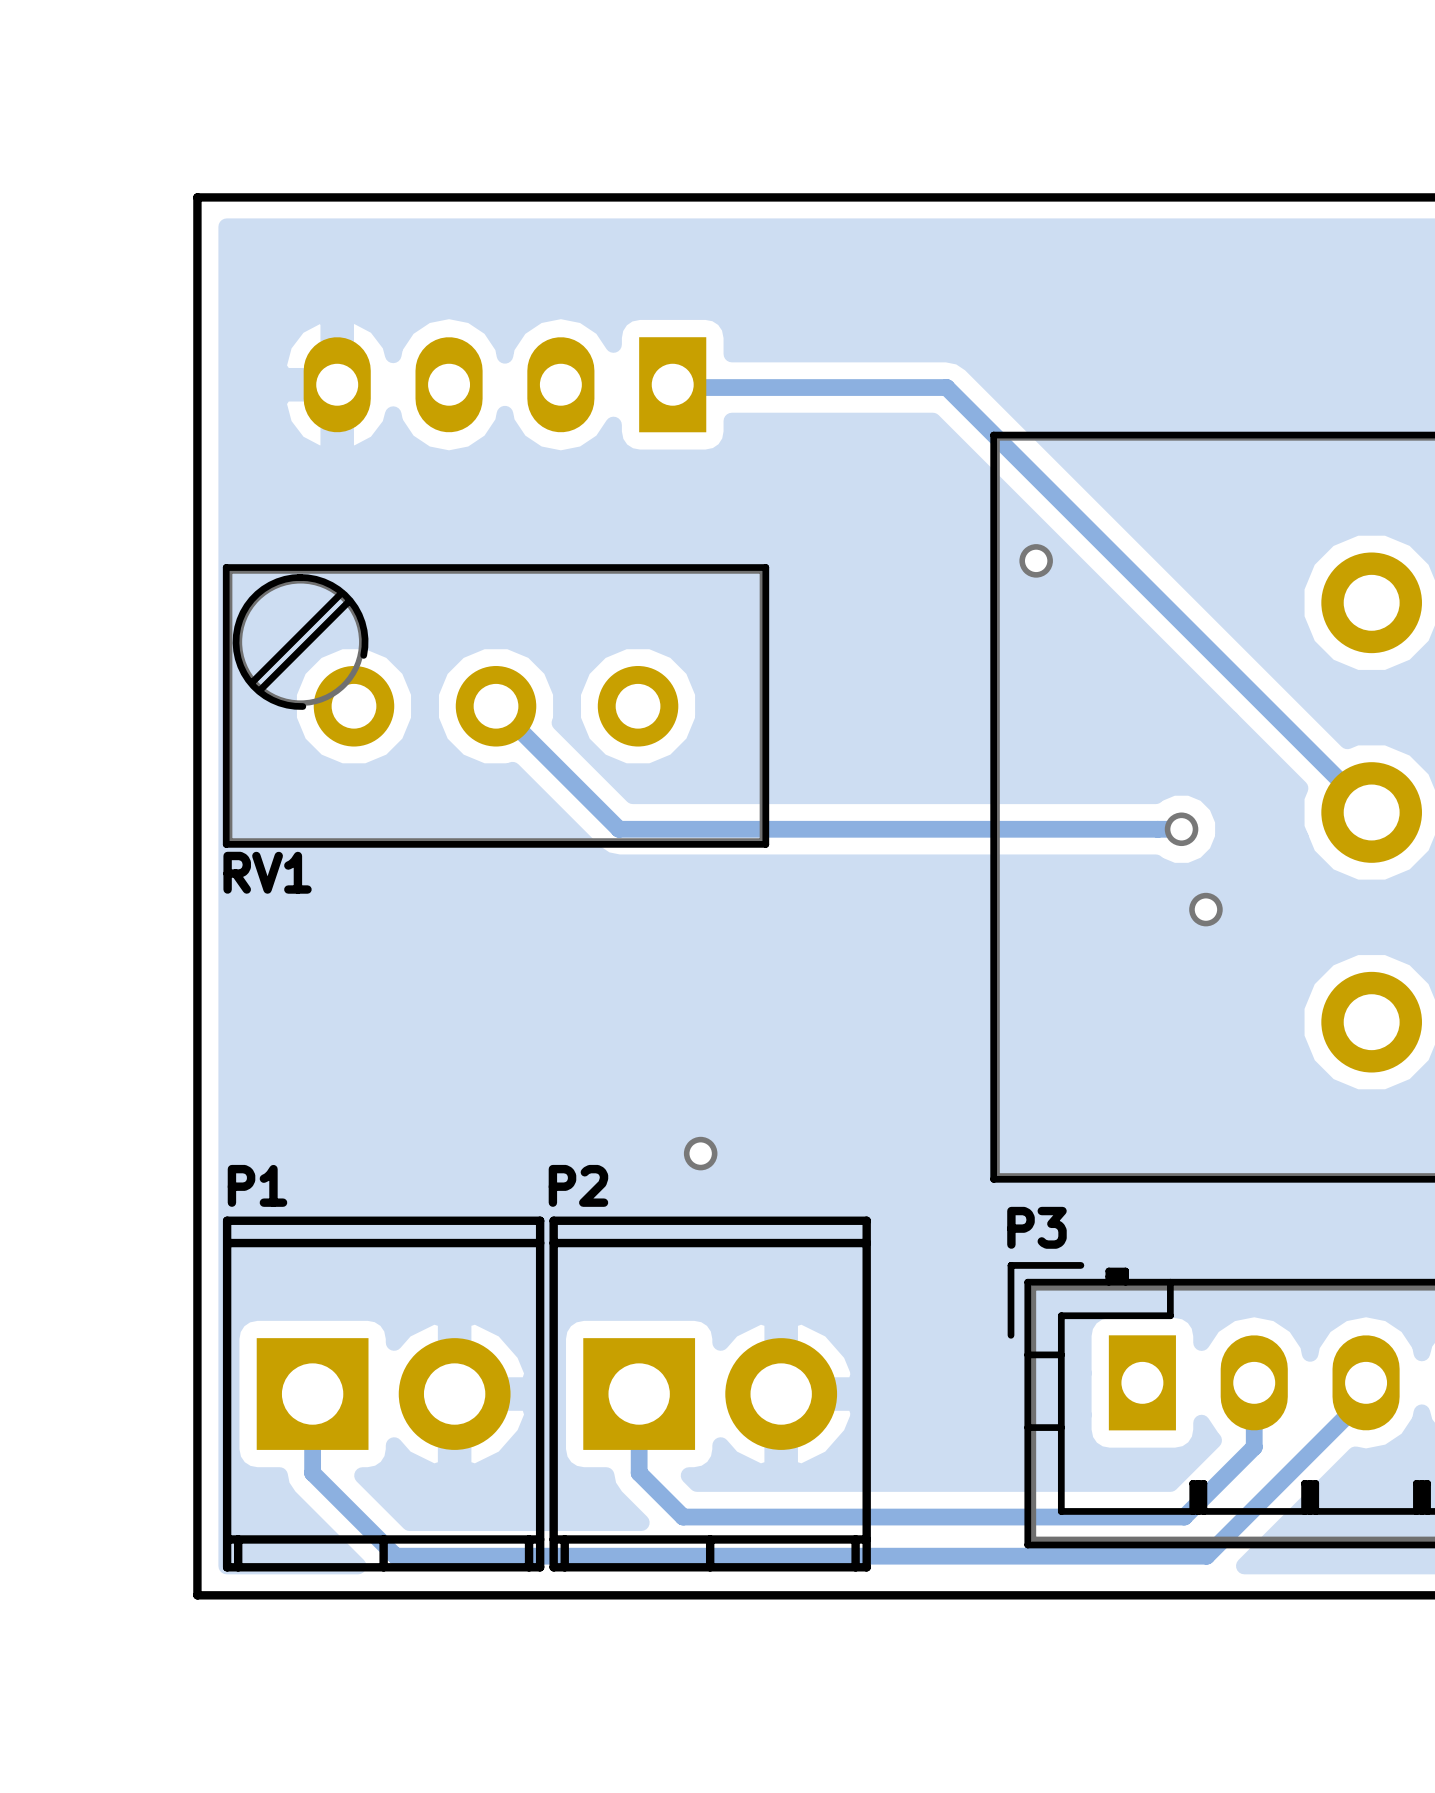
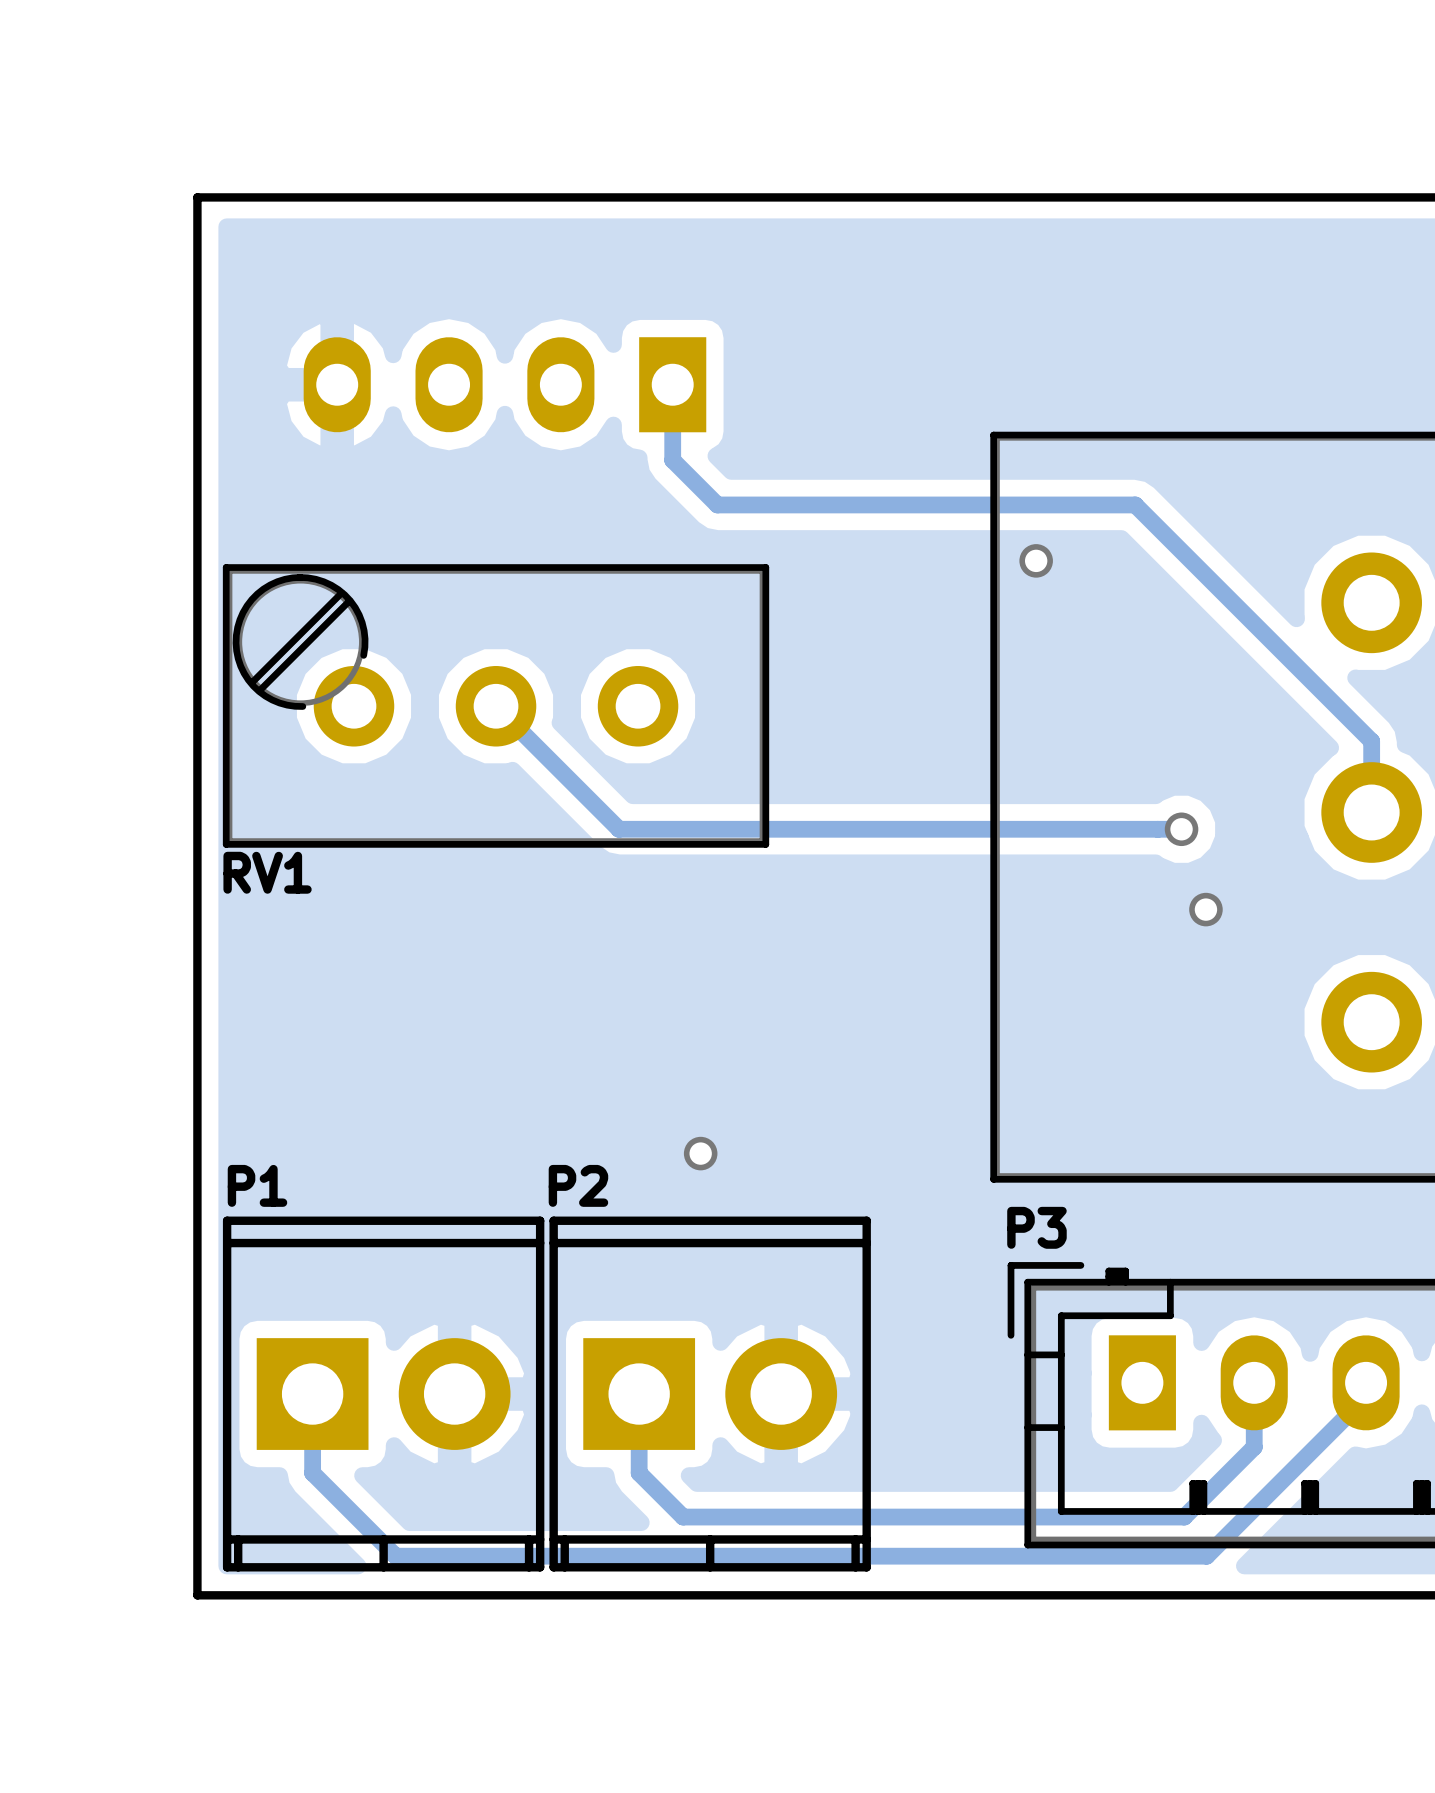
track: (678, 387) (946, 387) (1371, 812) -> (672, 384) (672, 460) (717, 504) (1135, 504) (1371, 741) (1371, 812)

